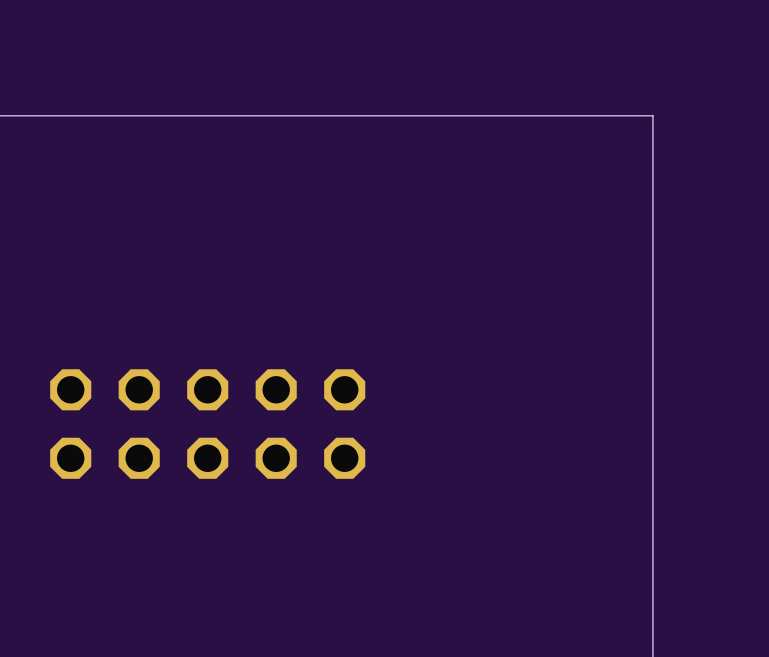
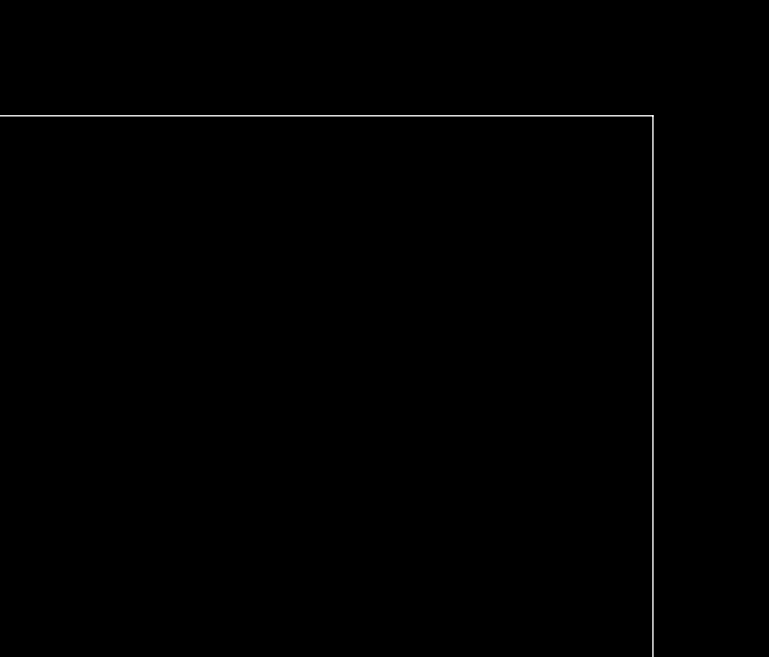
part: (207, 424) -> none

